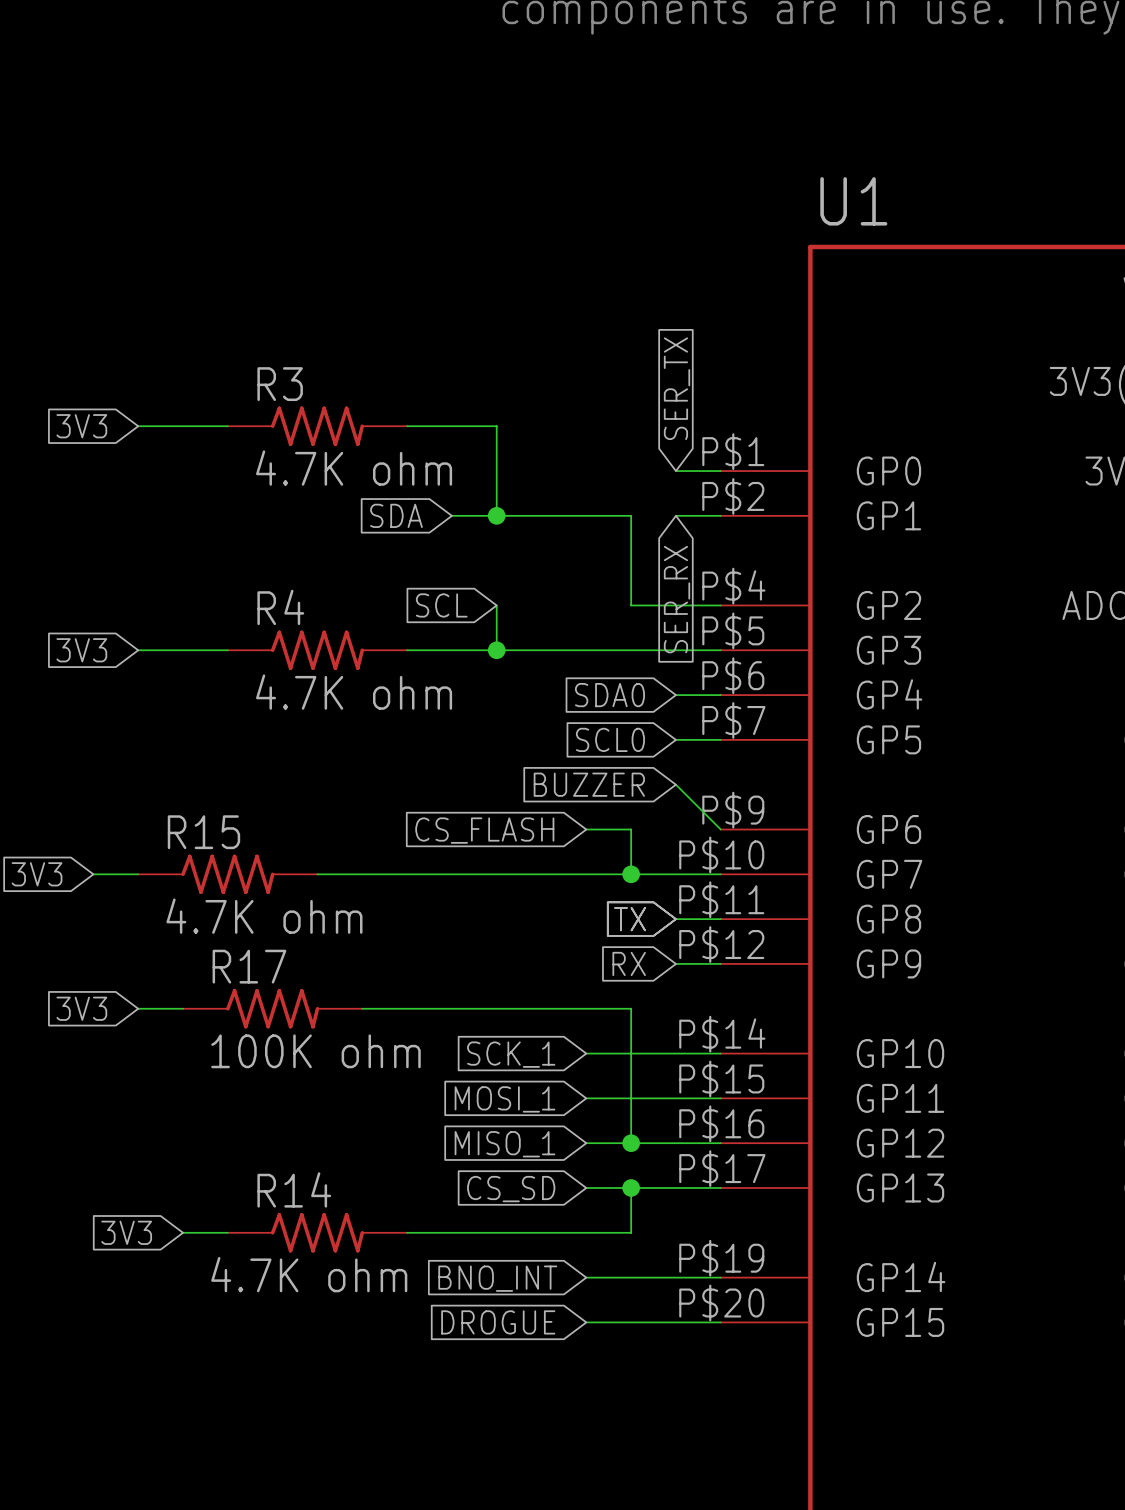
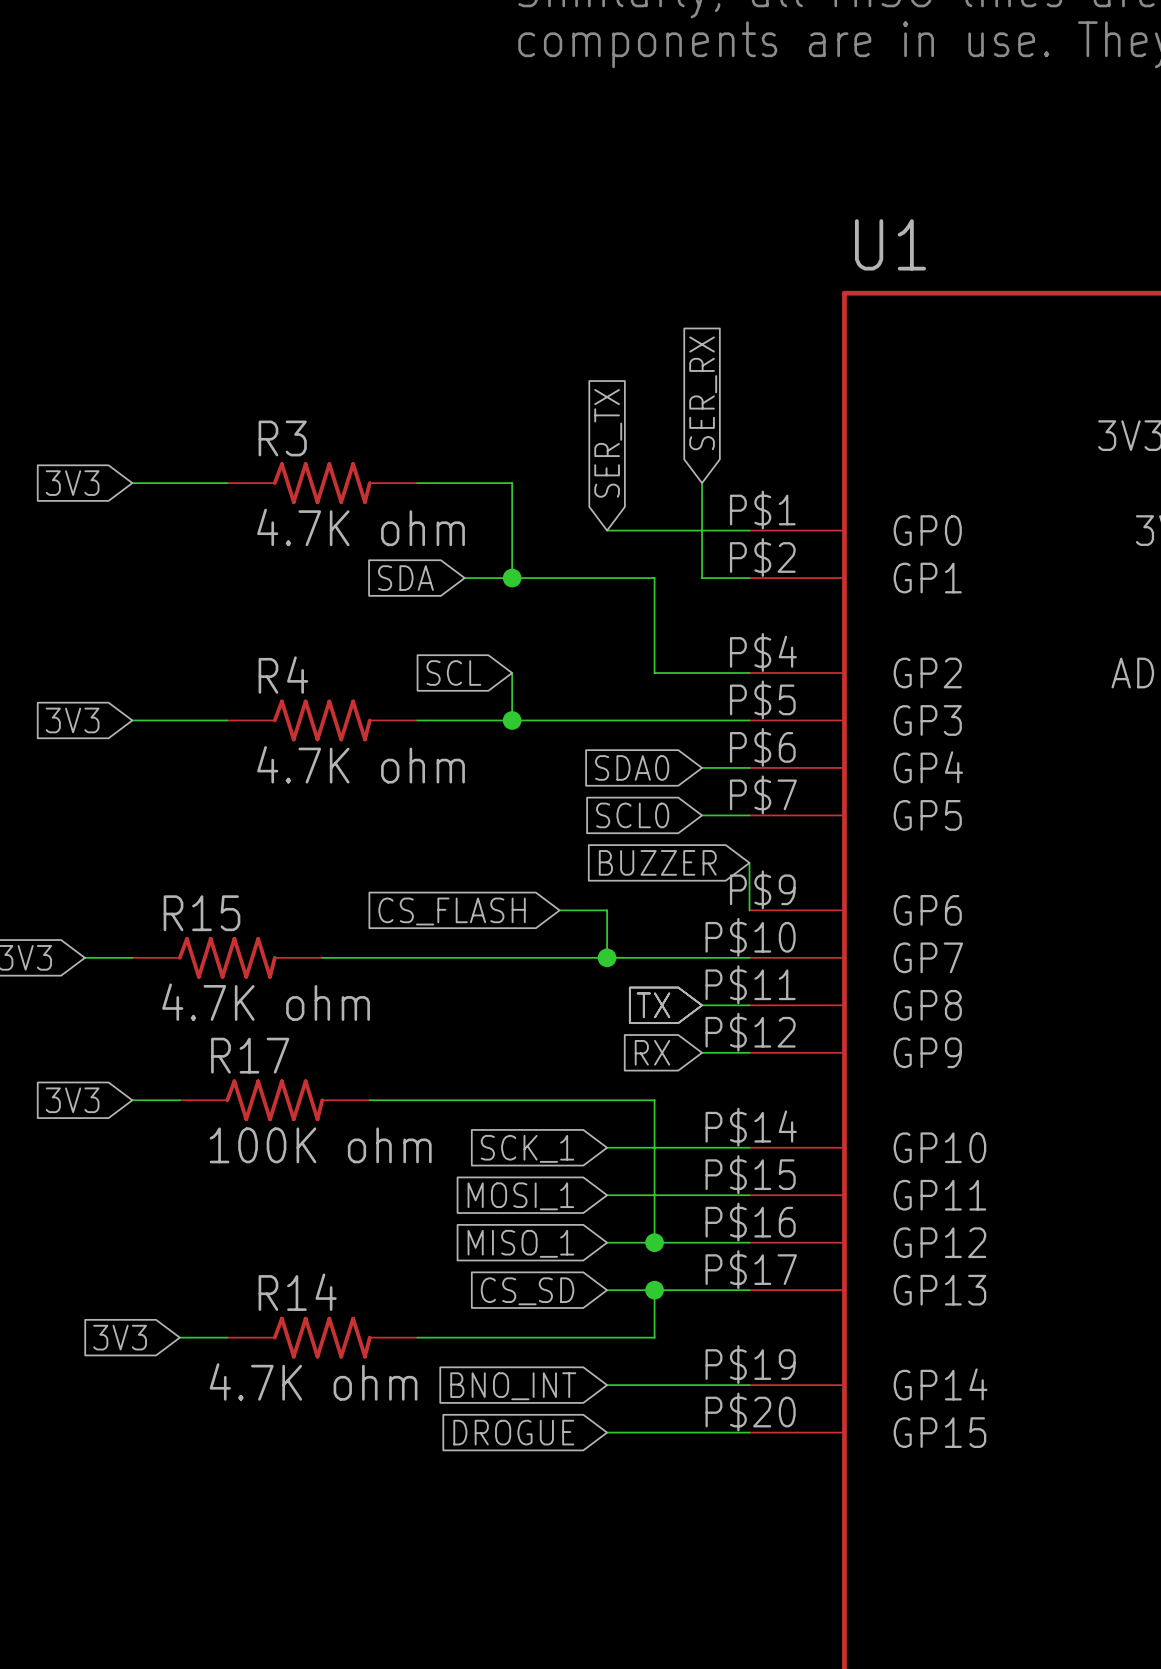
global label position: SER_TX (677, 388) -> SER_TX (608, 443)
wire: none -> (702, 483) (702, 578)
wire: none -> (607, 530) (702, 530)
global label rotation: 0° (677, 599) -> 180° (703, 393)
global label position: SER_RX (677, 599) -> SER_RX (703, 393)
global label position: BUZZER (589, 784) -> BUZZER (657, 862)
wire: (675, 784) (720, 829) -> (749, 862) (749, 910)
wire: (586, 829) (631, 829) (631, 874) -> (559, 910) (607, 910) (607, 957)
global label position: CS_FLASH (484, 830) -> CS_FLASH (452, 911)
junction position: (631, 874) -> (607, 957)

